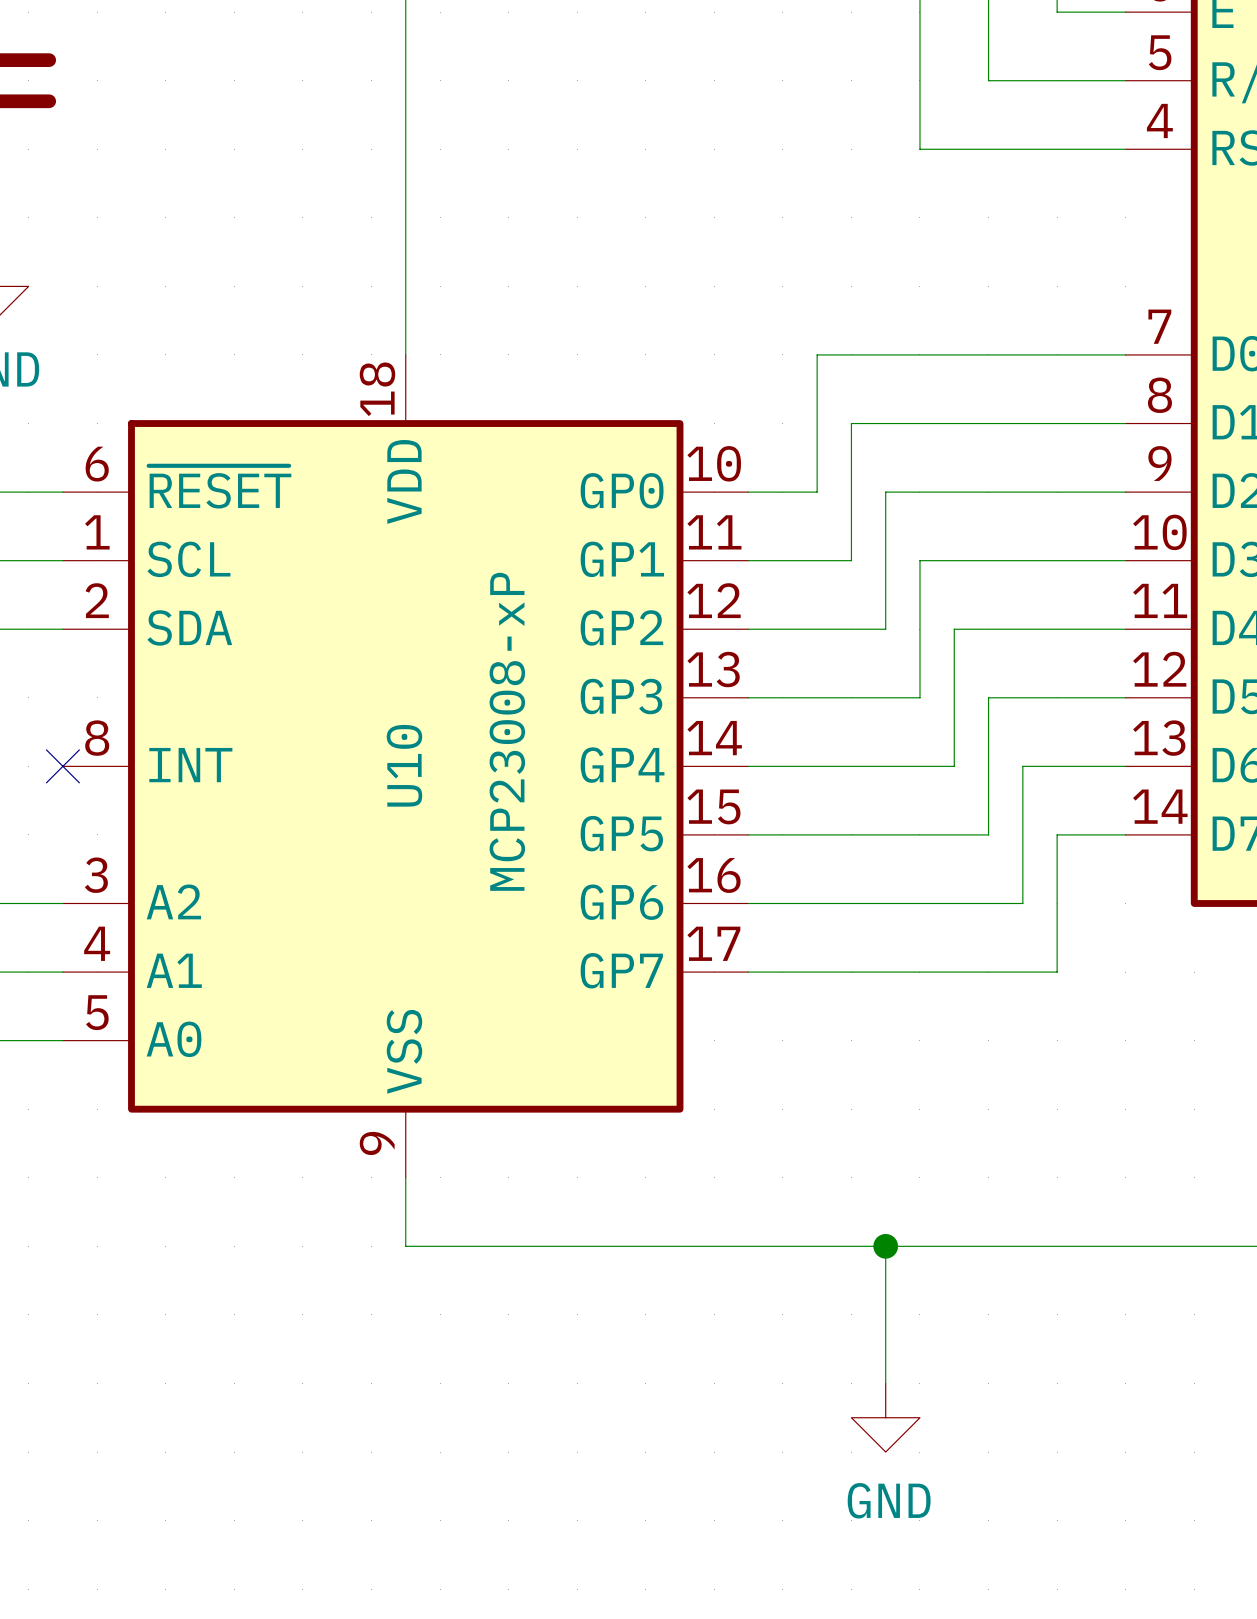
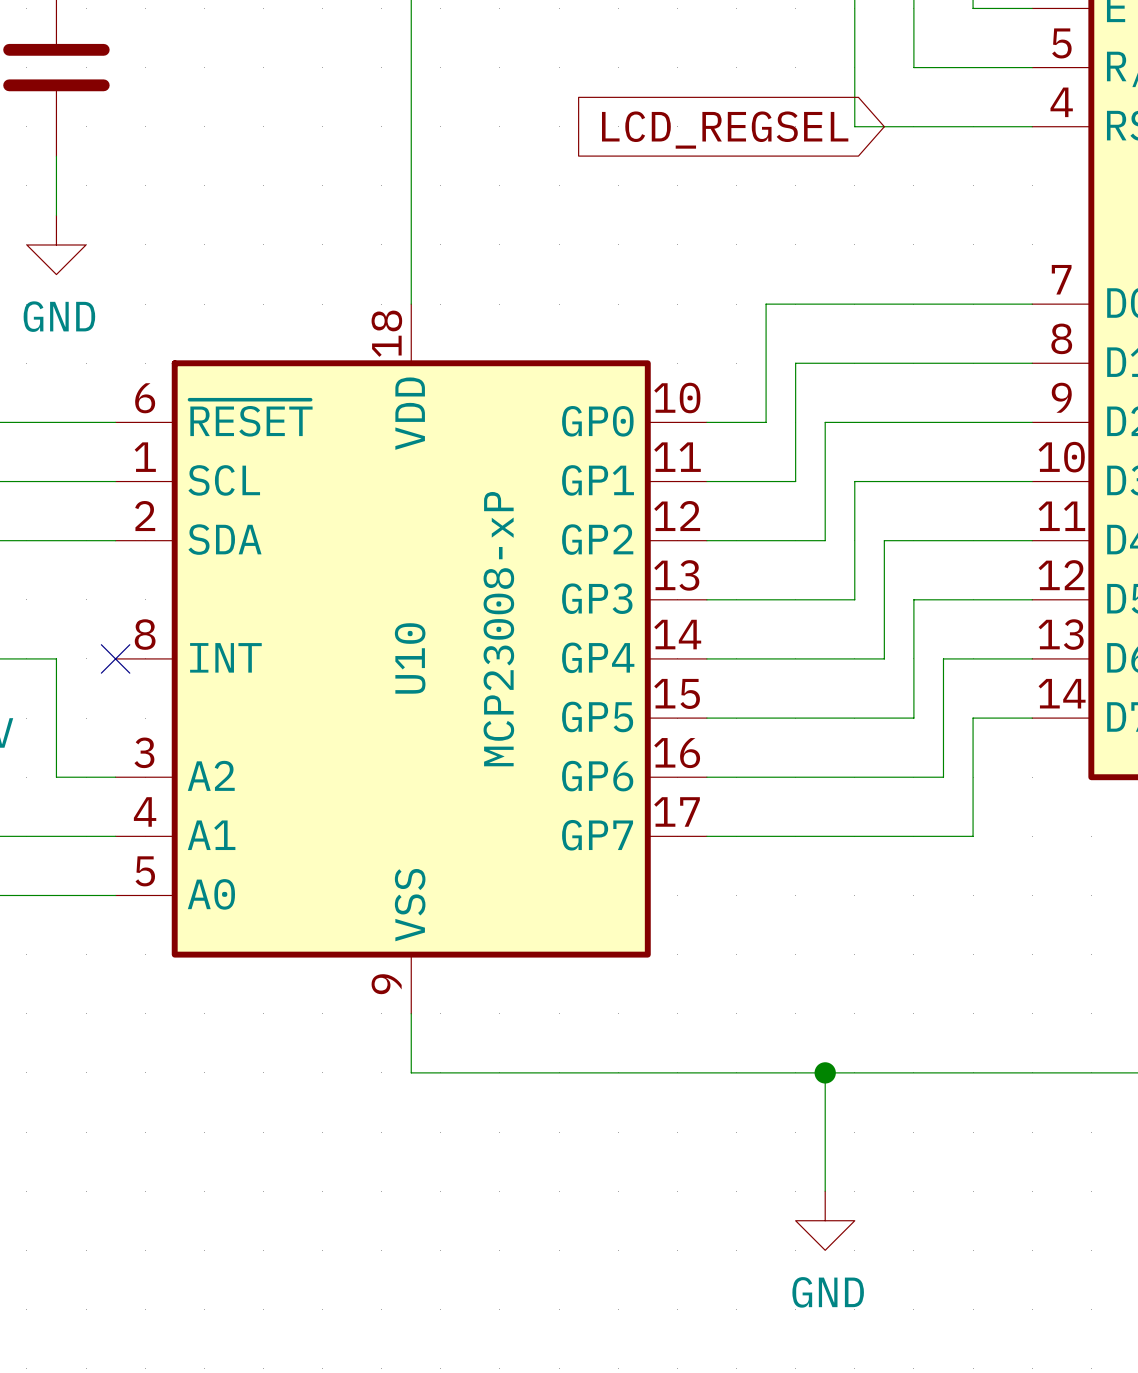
global label: none -> LCD_REGSEL (725, 130)

